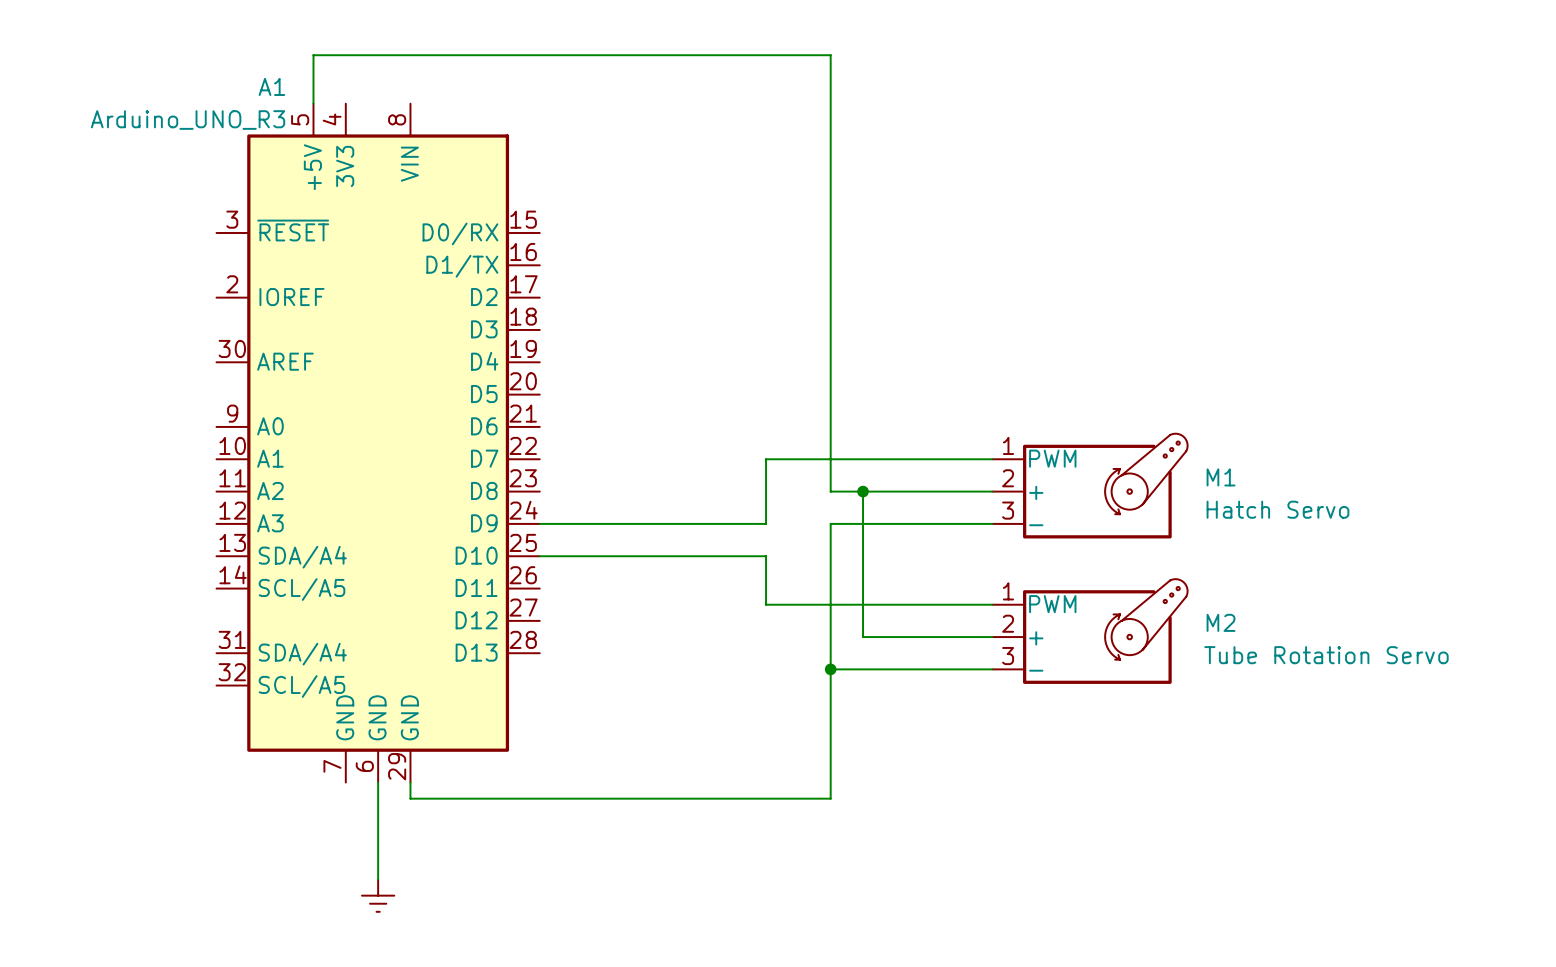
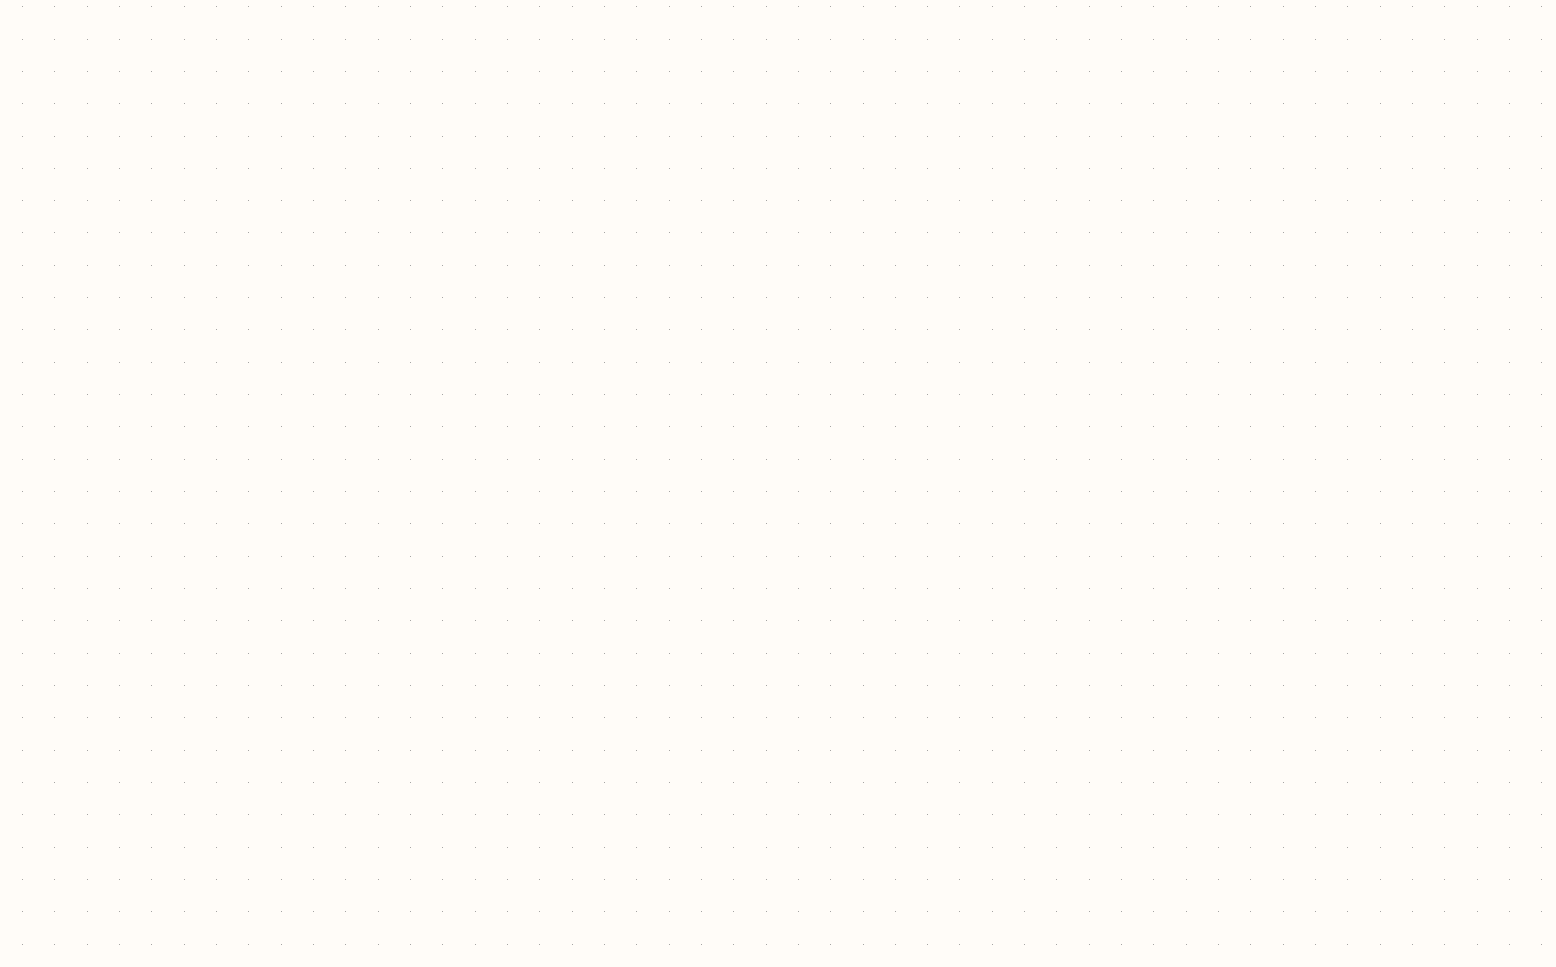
wire: (313, 103) (313, 55) (830, 55) (830, 491) (992, 491) -> none
A1: Arduino_UNO_R3 (378, 443) -> none
wire: (992, 459) (766, 459) (766, 523) (539, 523) -> none
M1: Hatch Servo (1089, 486) -> none
wire: (863, 491) (863, 637) (992, 637) -> none
junction: (863, 491) -> none
wire: (992, 523) (830, 523) (830, 798) (410, 798) (410, 782) -> none
wire: (539, 556) (766, 556) (766, 604) (992, 604) -> none
M2: Tube Rotation Servo (1089, 631) -> none
wire: (830, 669) (992, 669) -> none
junction: (830, 669) -> none
wire: (378, 782) (378, 879) -> none
power symbol: (378, 895) -> none

